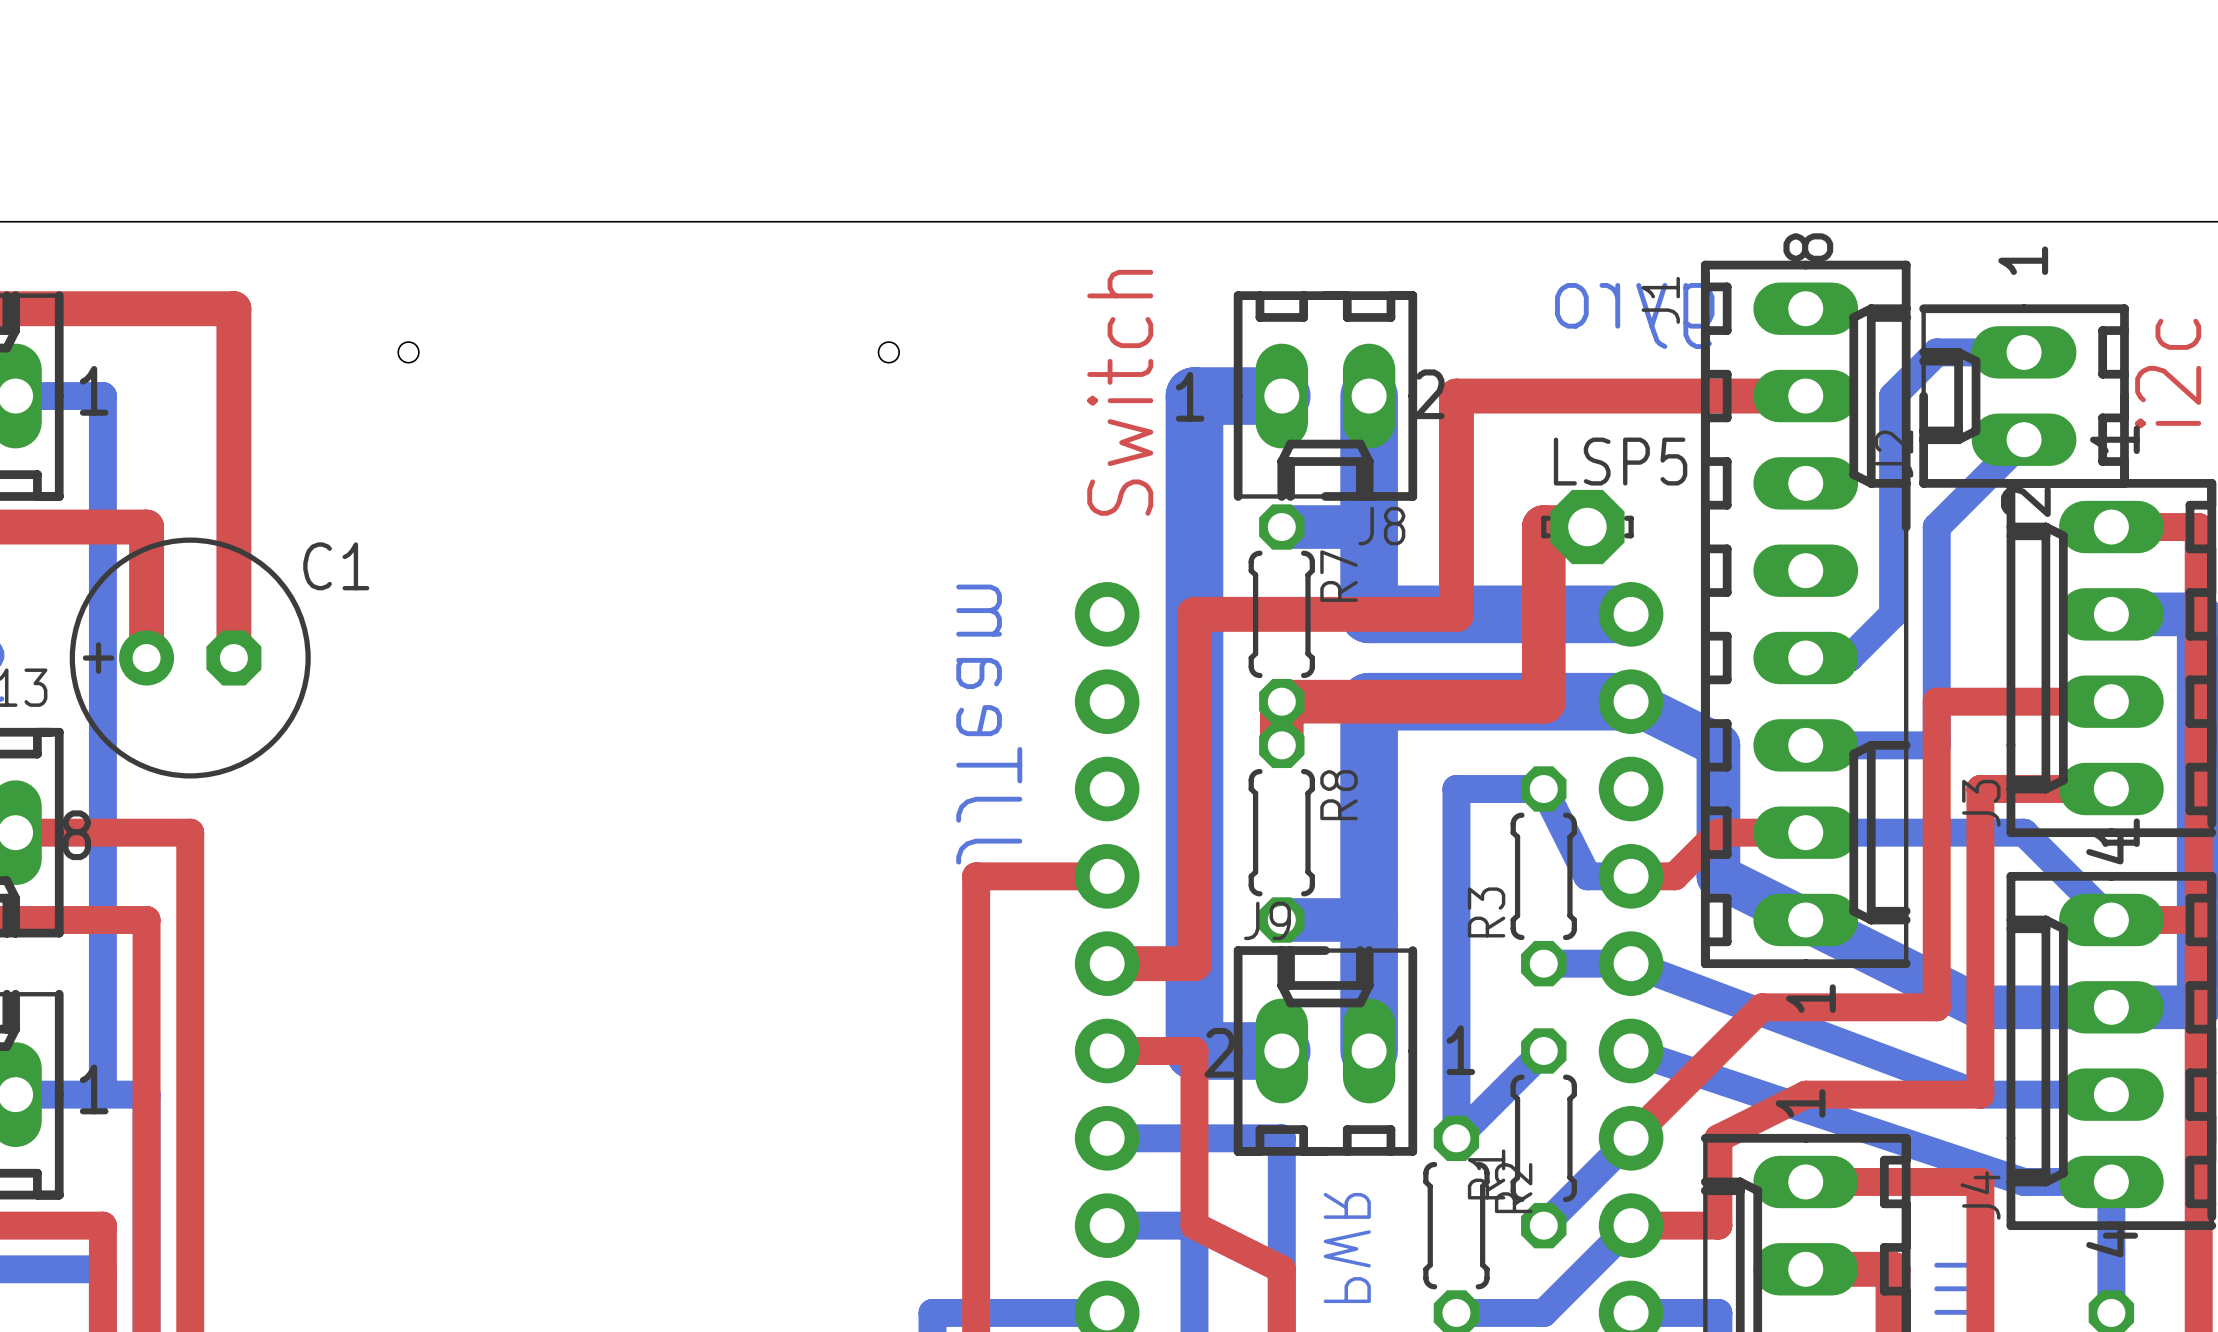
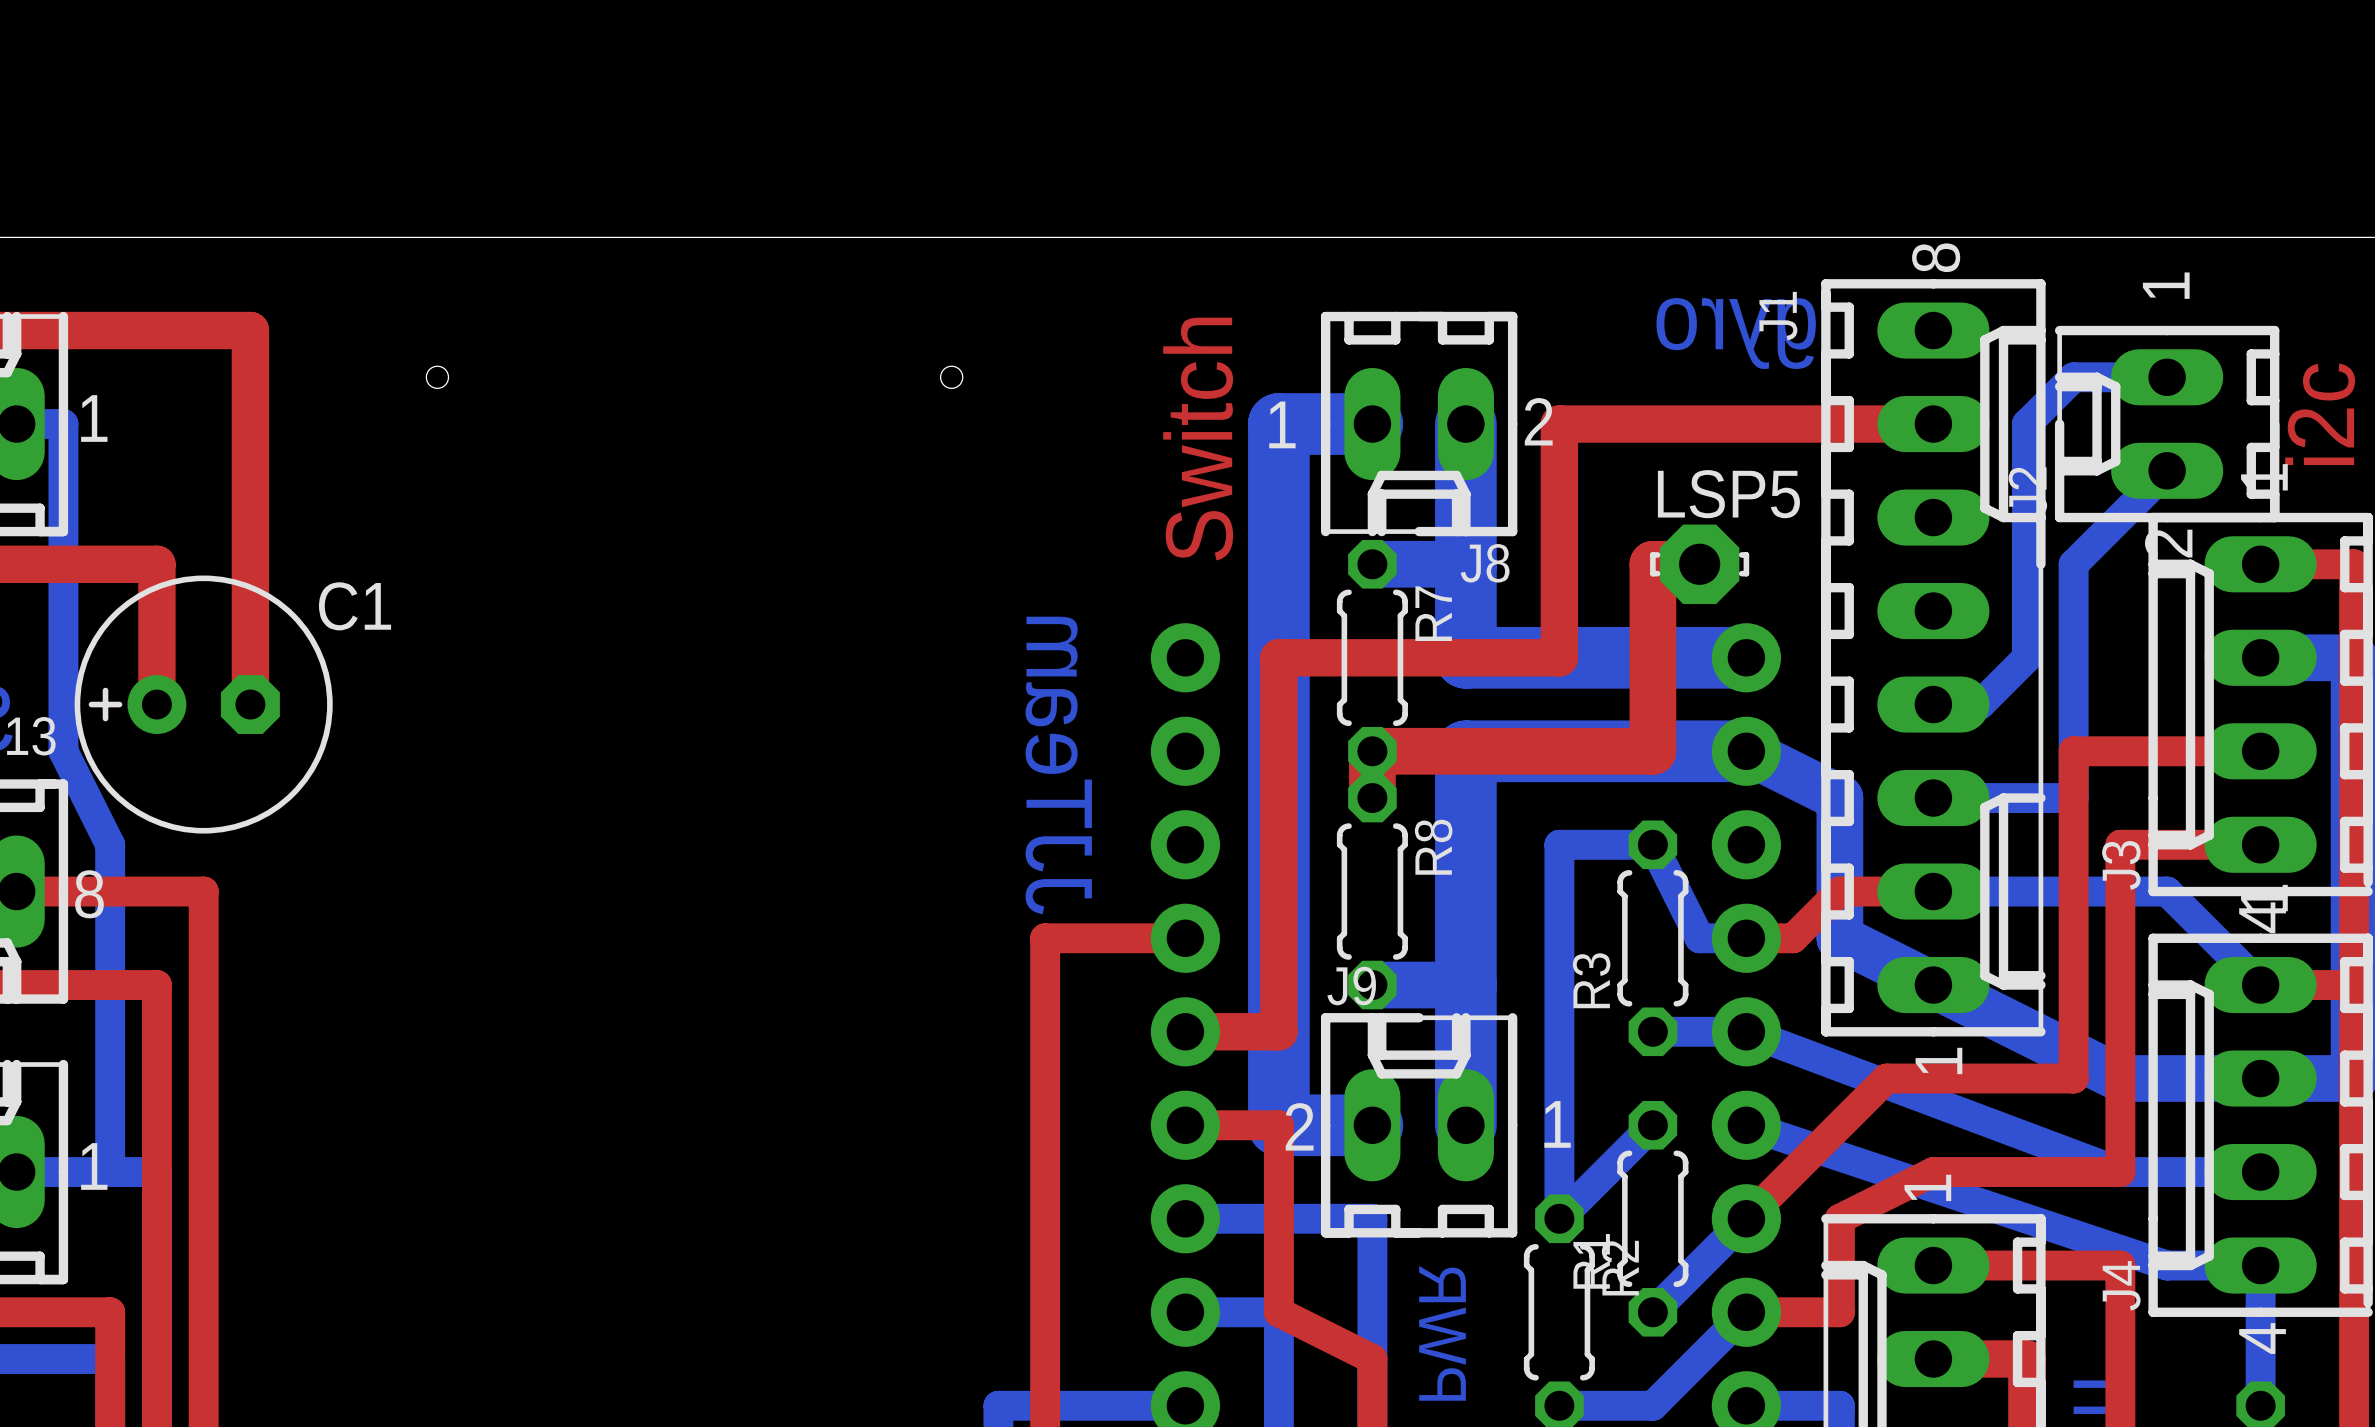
bottom track: (59, 396) (102, 396) (102, 789) -> (63, 424) (63, 751) (110, 844)

